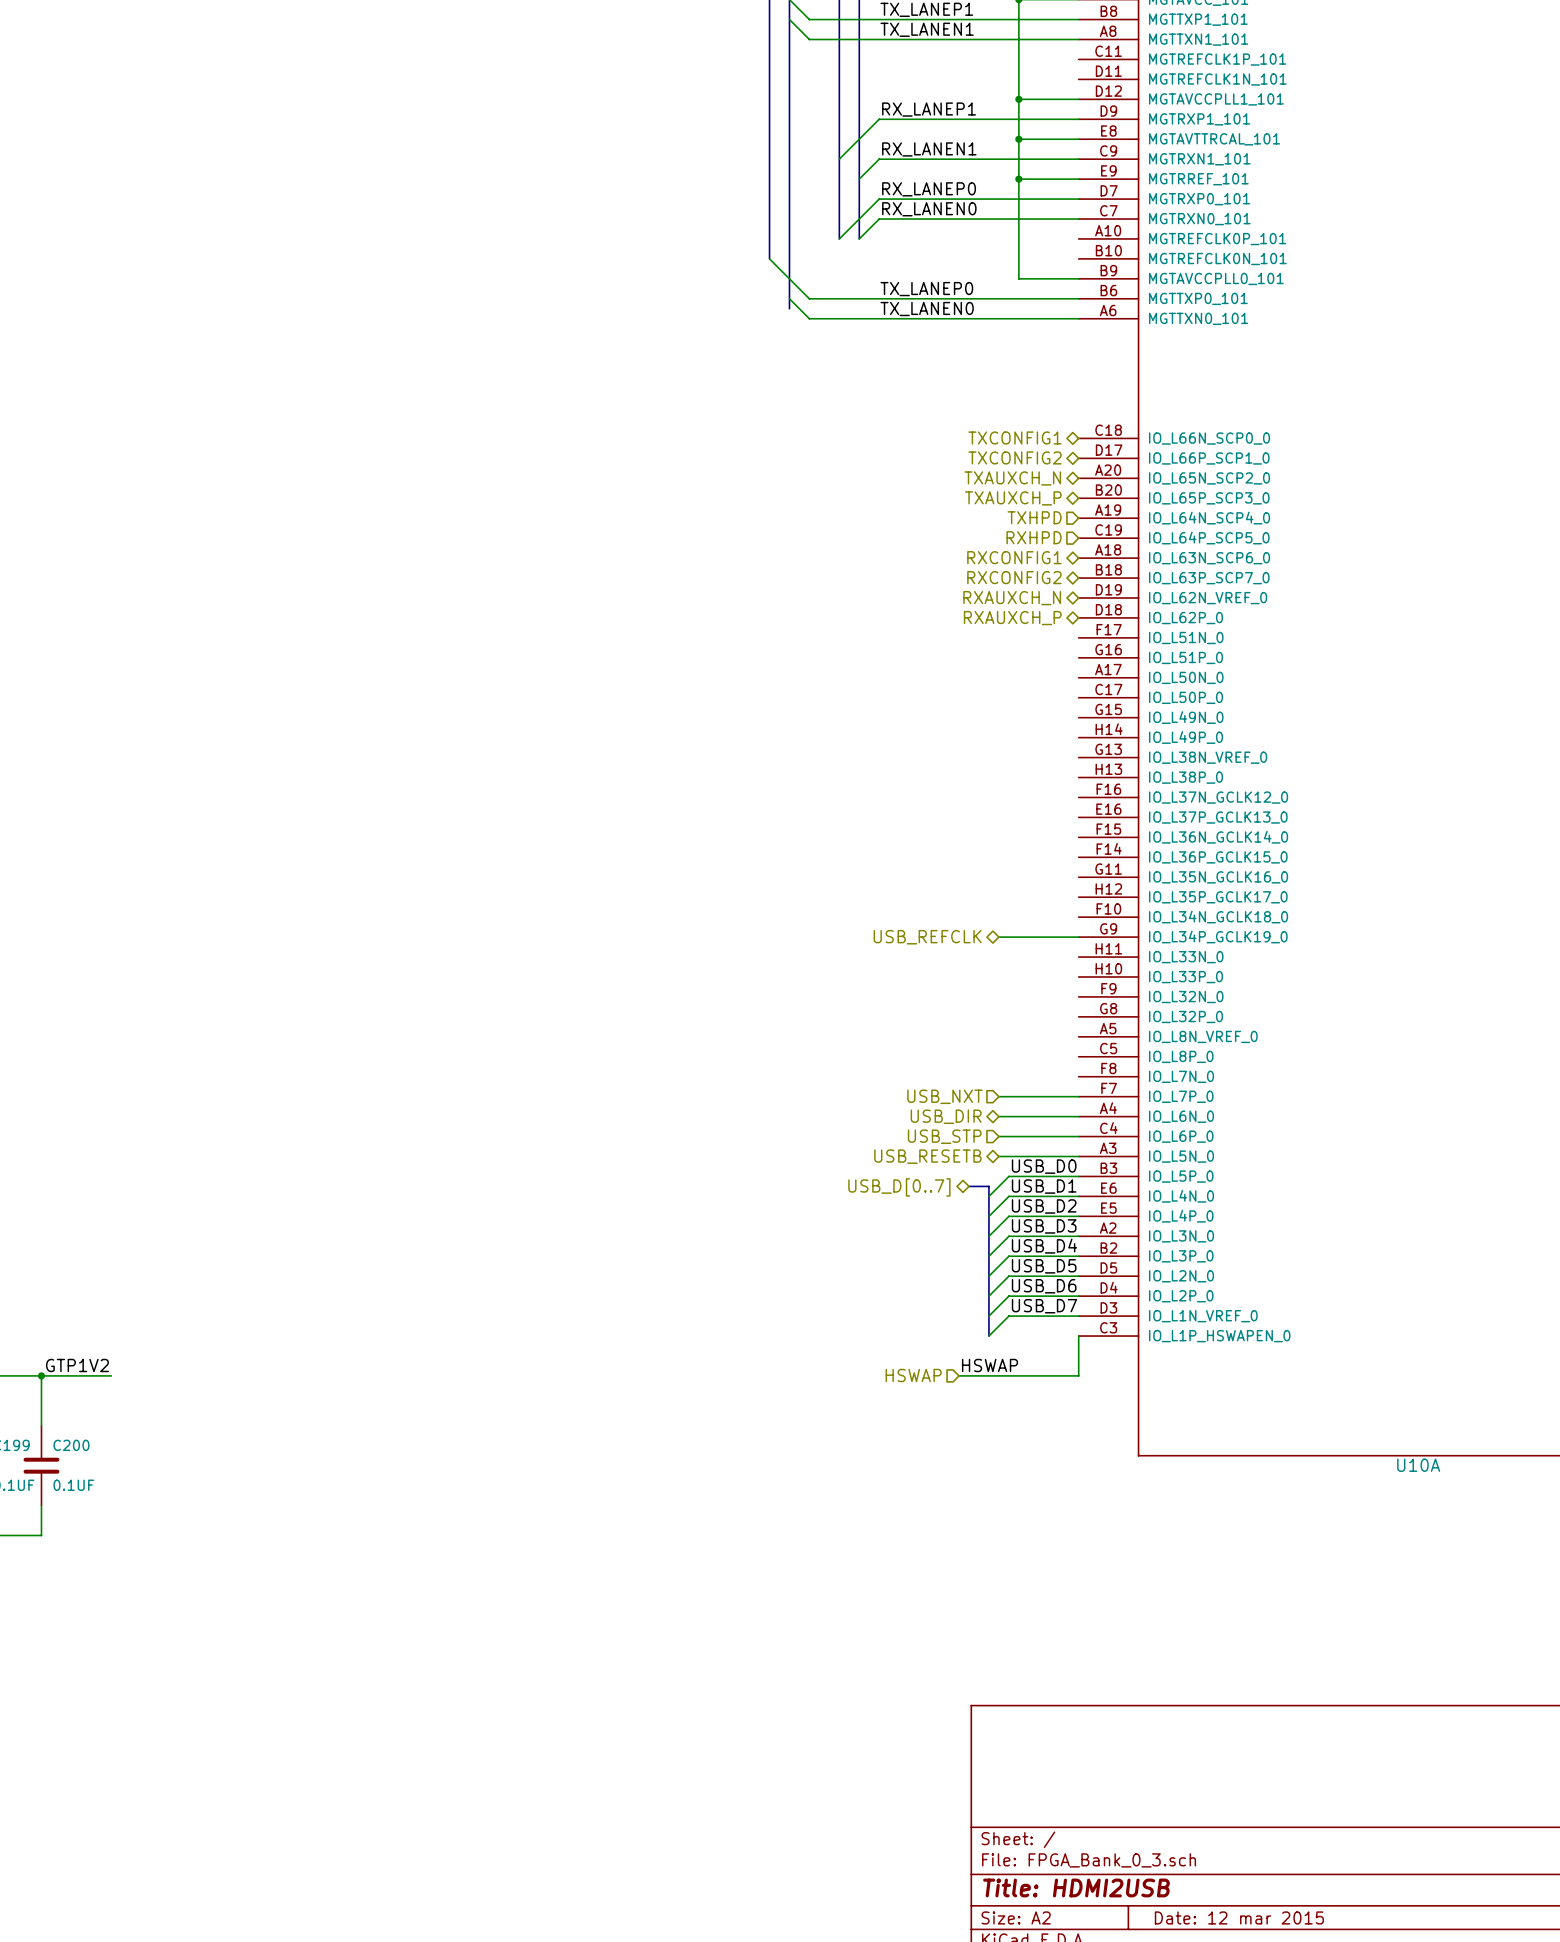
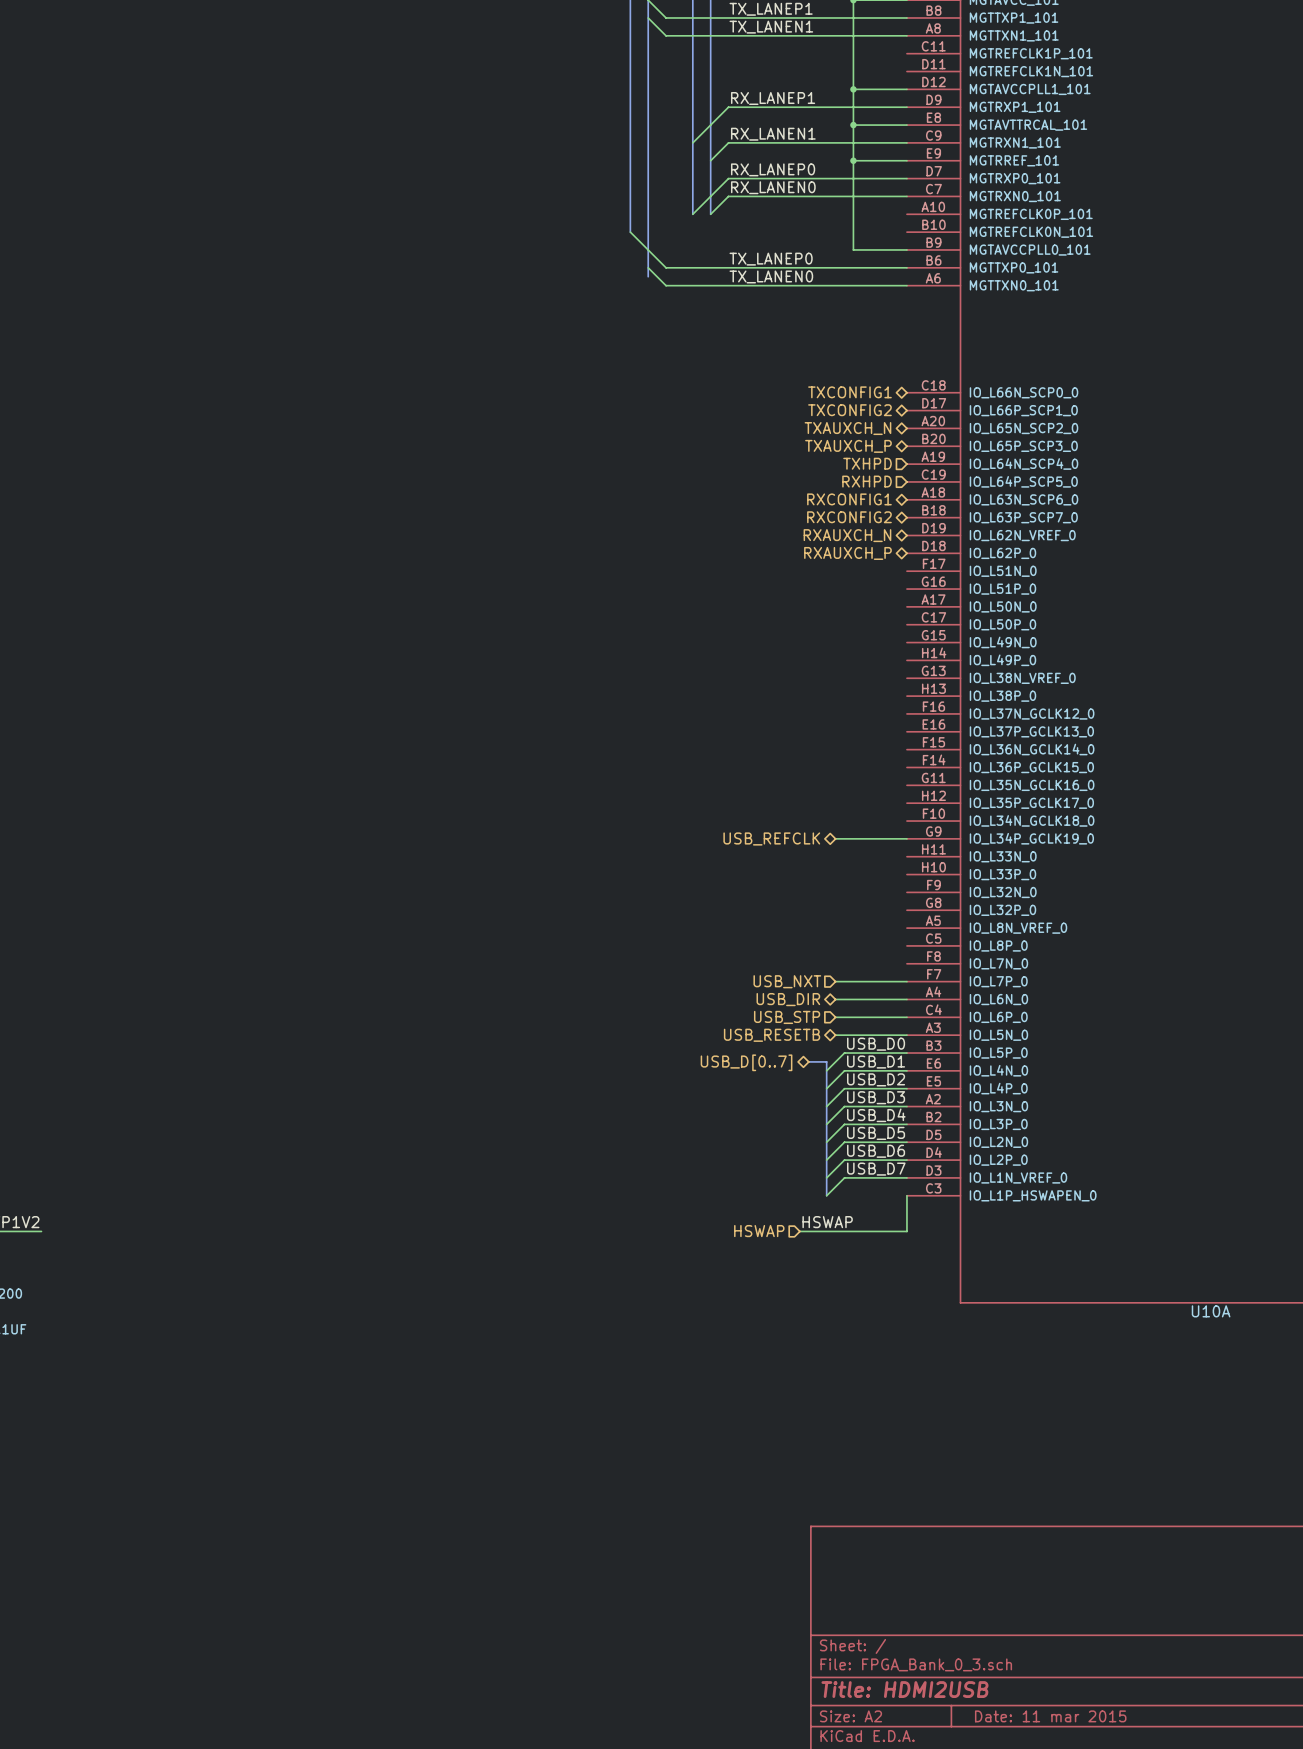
title block: Date: 12 mar 2015 (1239, 1917) -> Date: 11 mar 2015 (1050, 1716)

